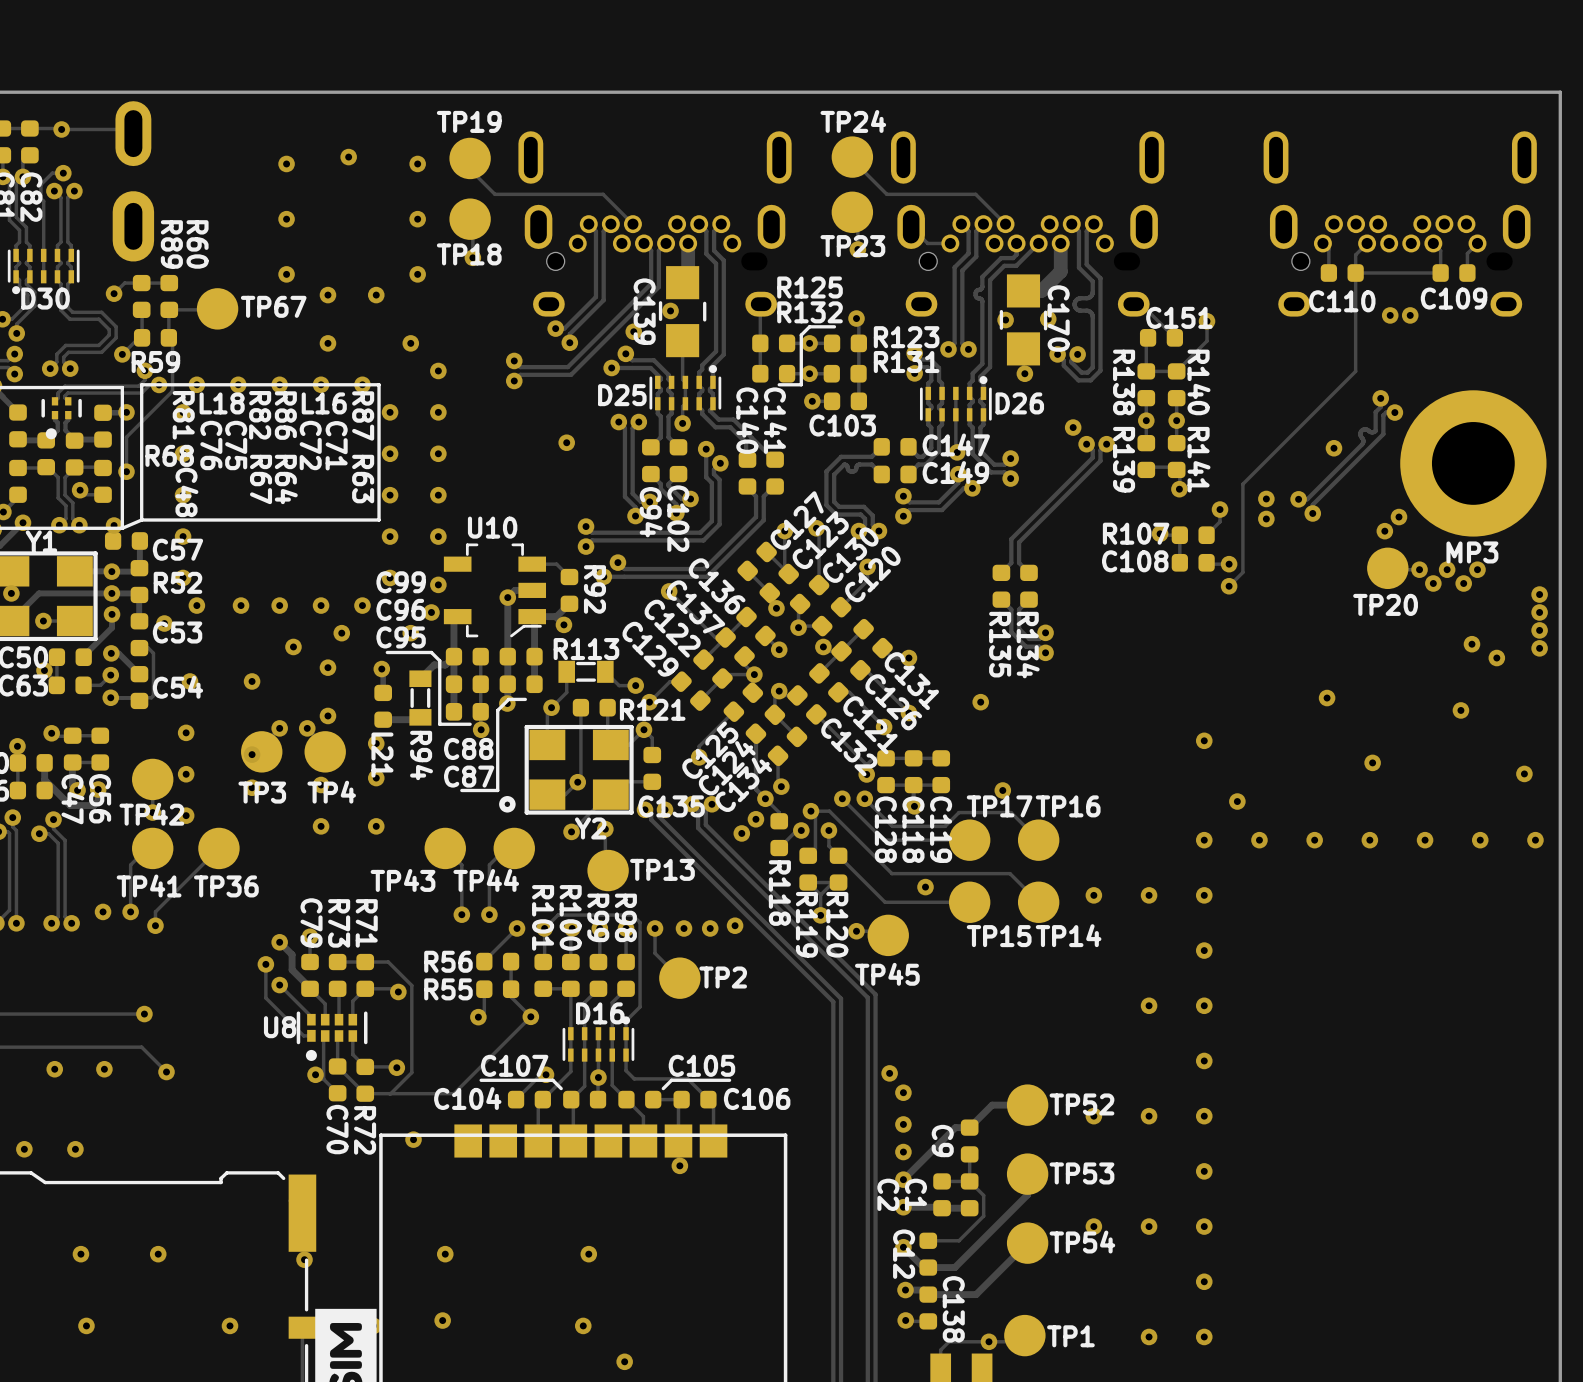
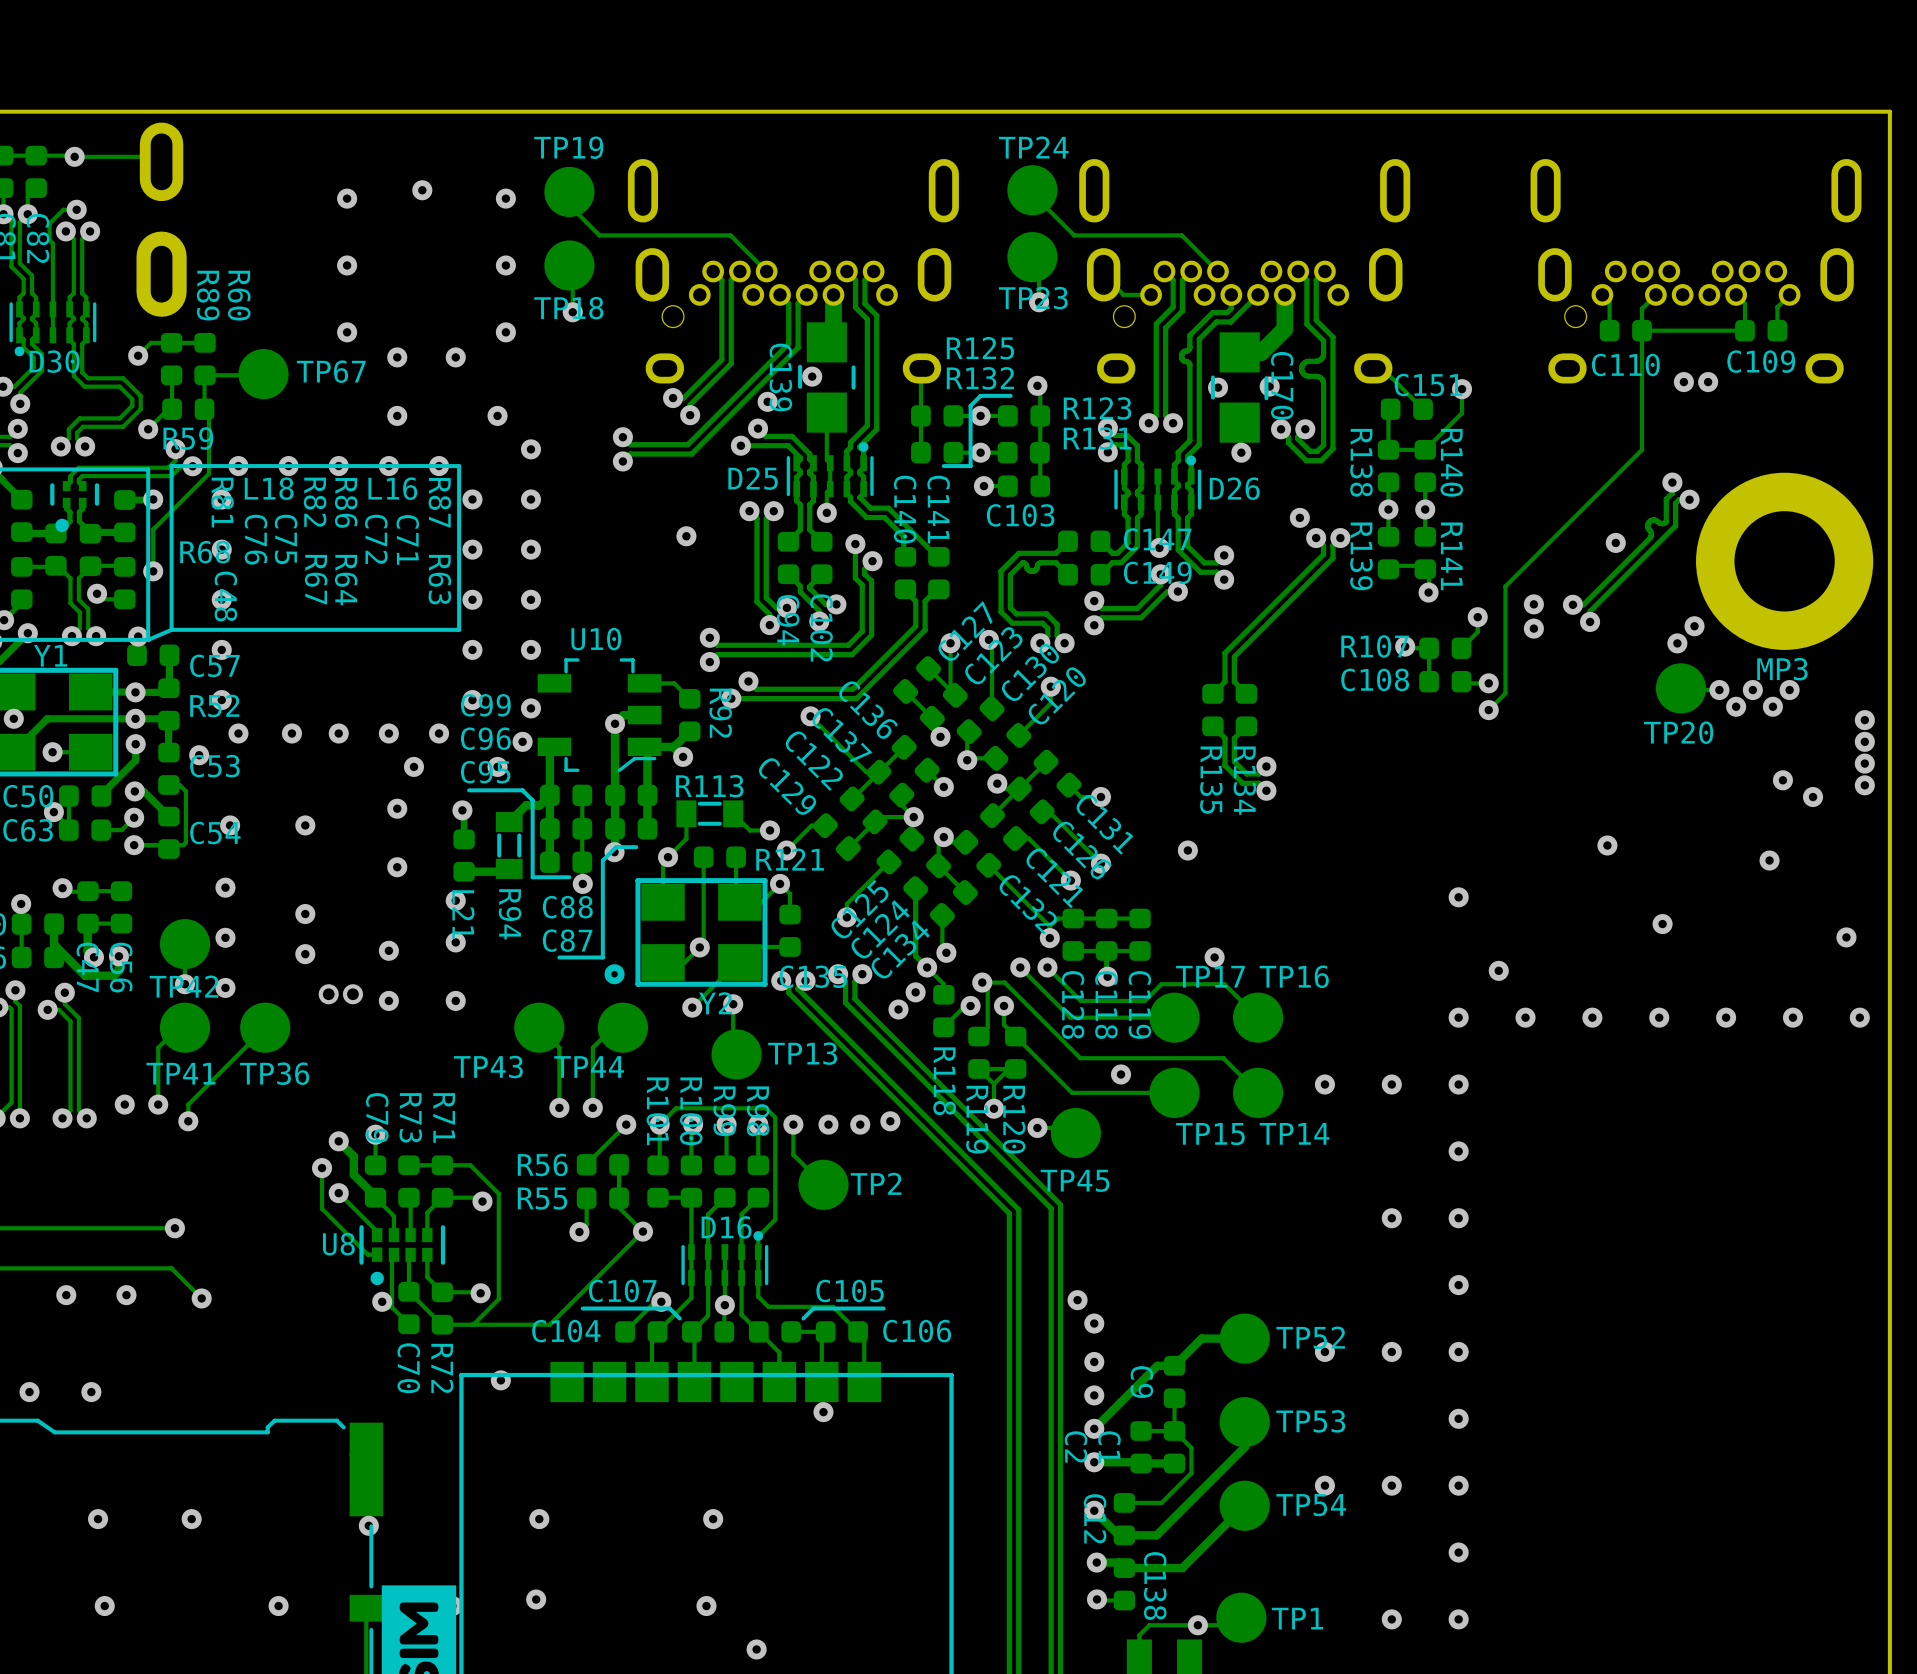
via: (293, 646) -> none
via: (279, 728) -> none
via: (307, 728) -> none
TP3: (261, 751) -> none
TP4: (325, 751) -> none
via: none -> (328, 994)
via: none -> (352, 994)

